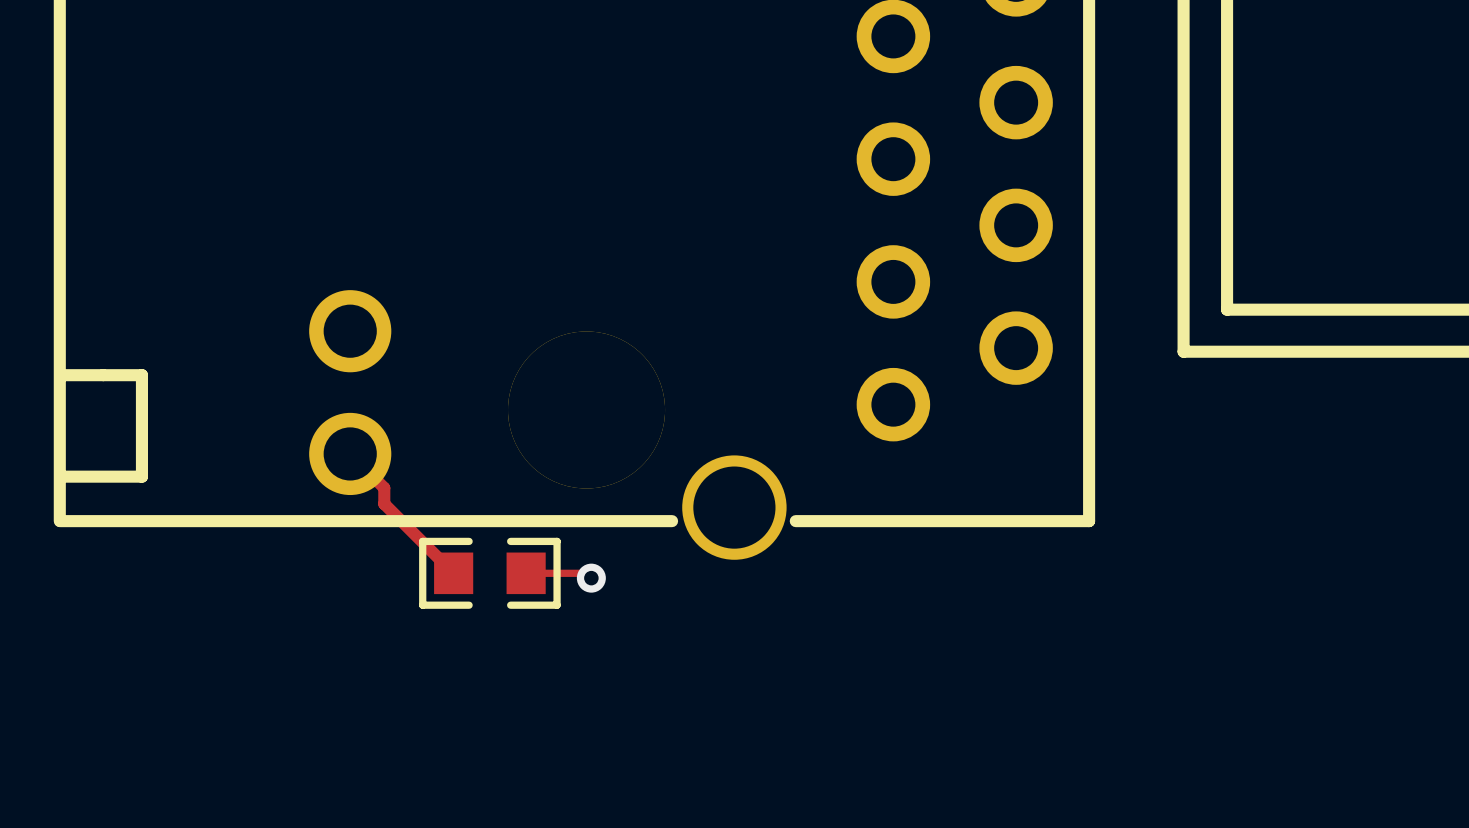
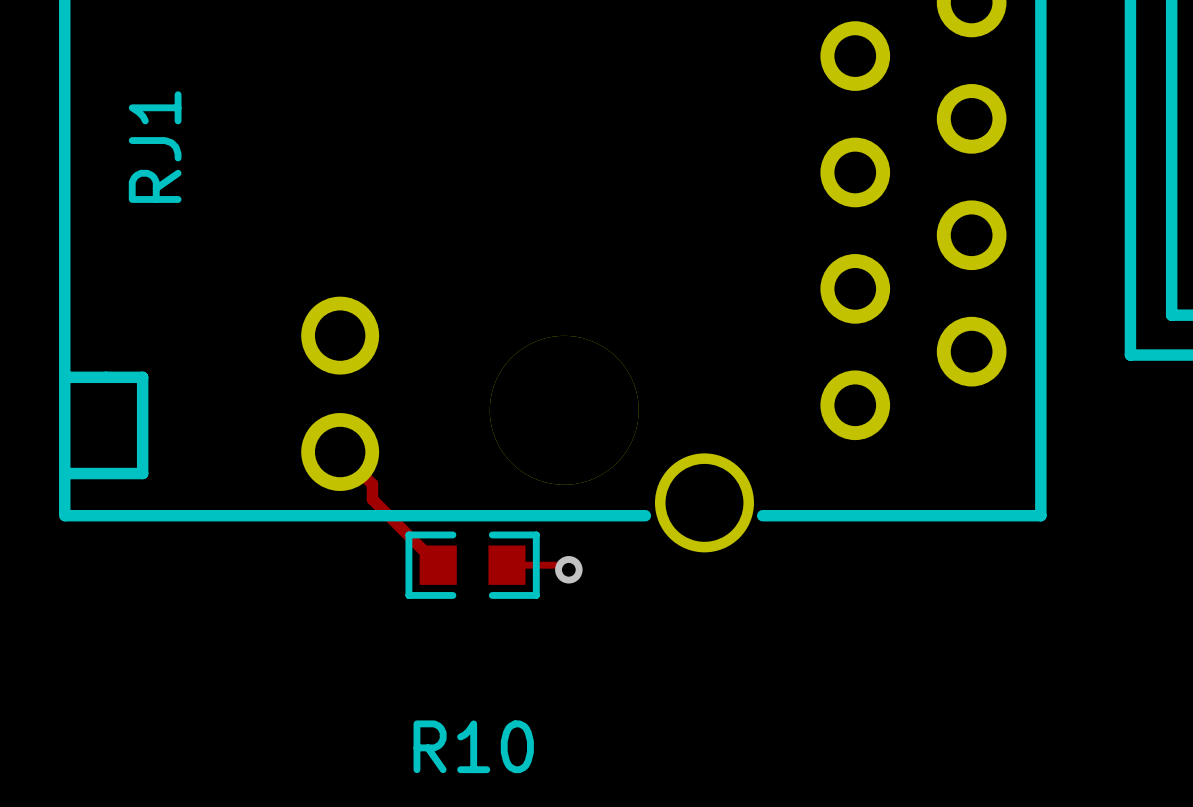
RJ1 name: none -> RJ1 (155, 147)
R10 name: none -> R10 (473, 746)

